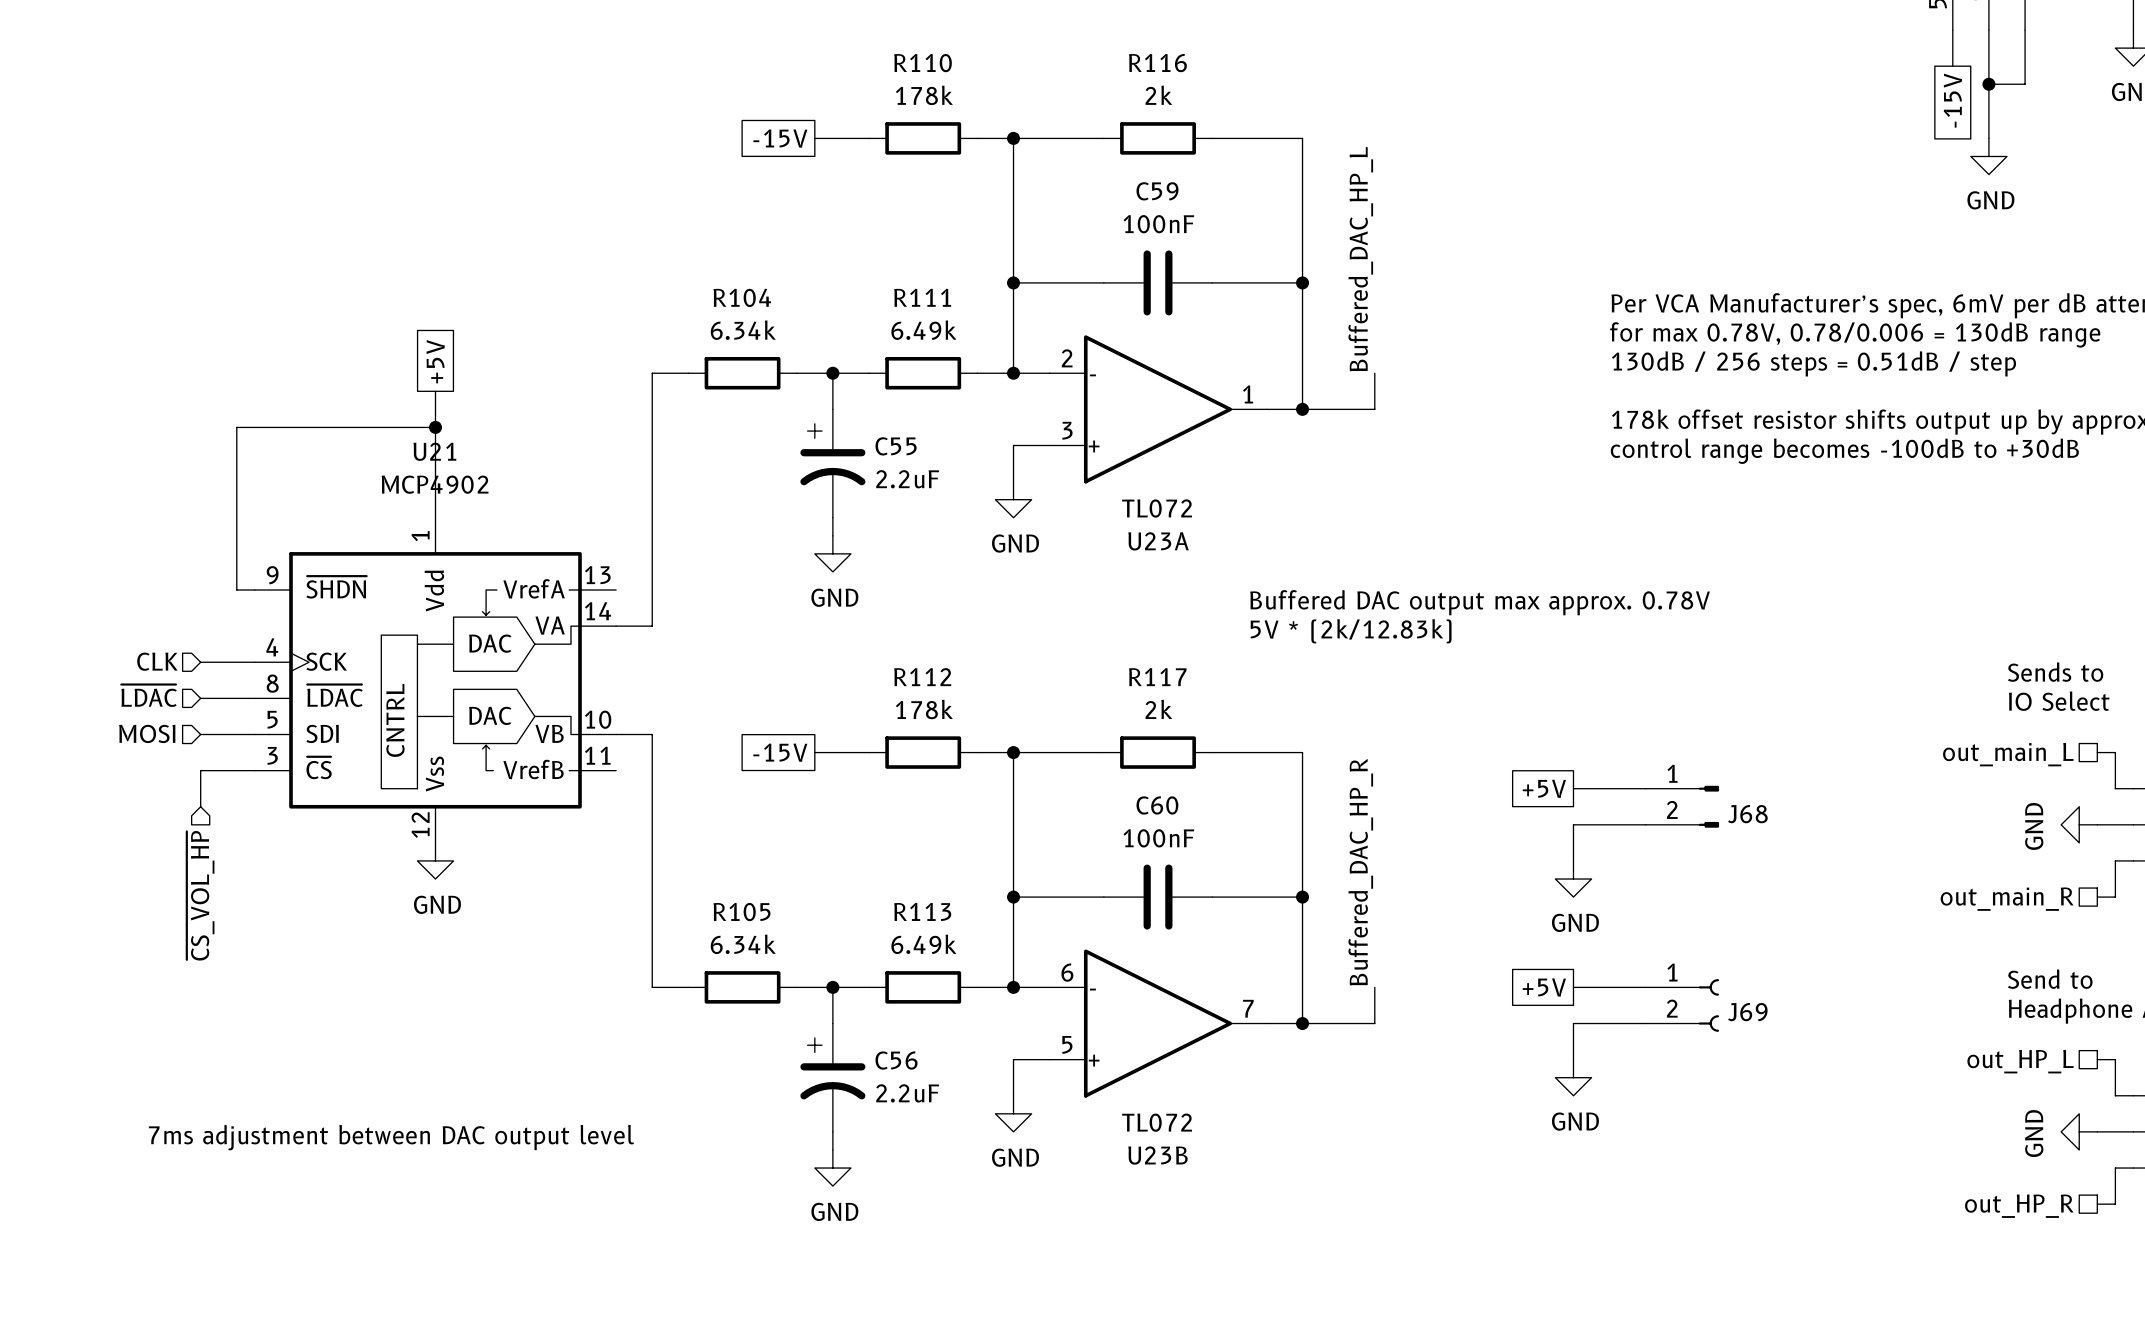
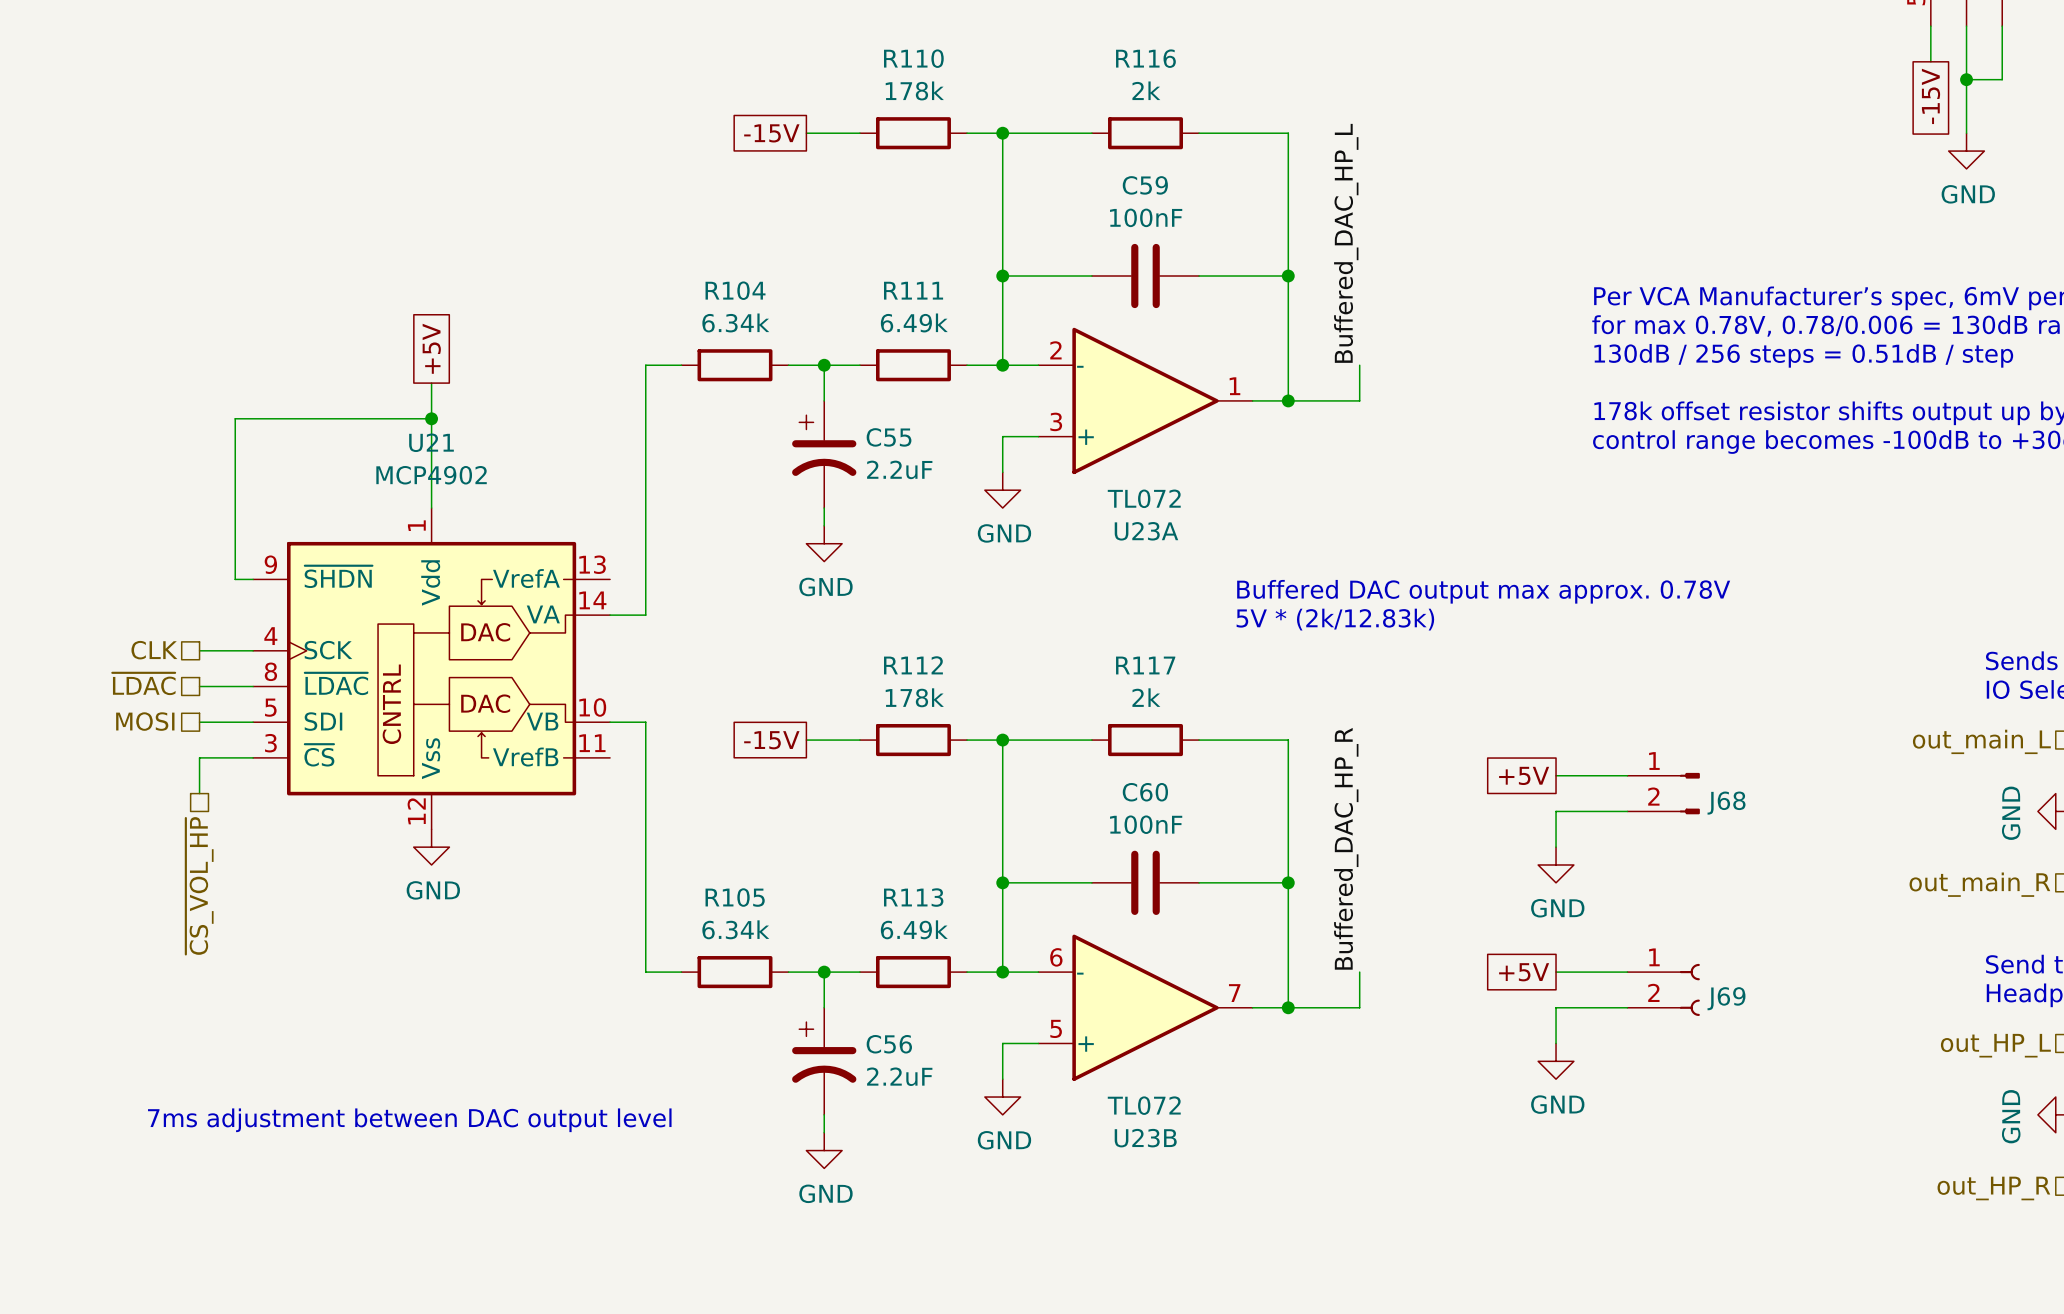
hierarchical label shape: input (157, 661) -> passive (154, 650)
hierarchical label shape: input (149, 695) -> passive (143, 683)
hierarchical label shape: input (147, 733) -> passive (145, 721)
hierarchical label shape: input (200, 895) -> passive (199, 885)

